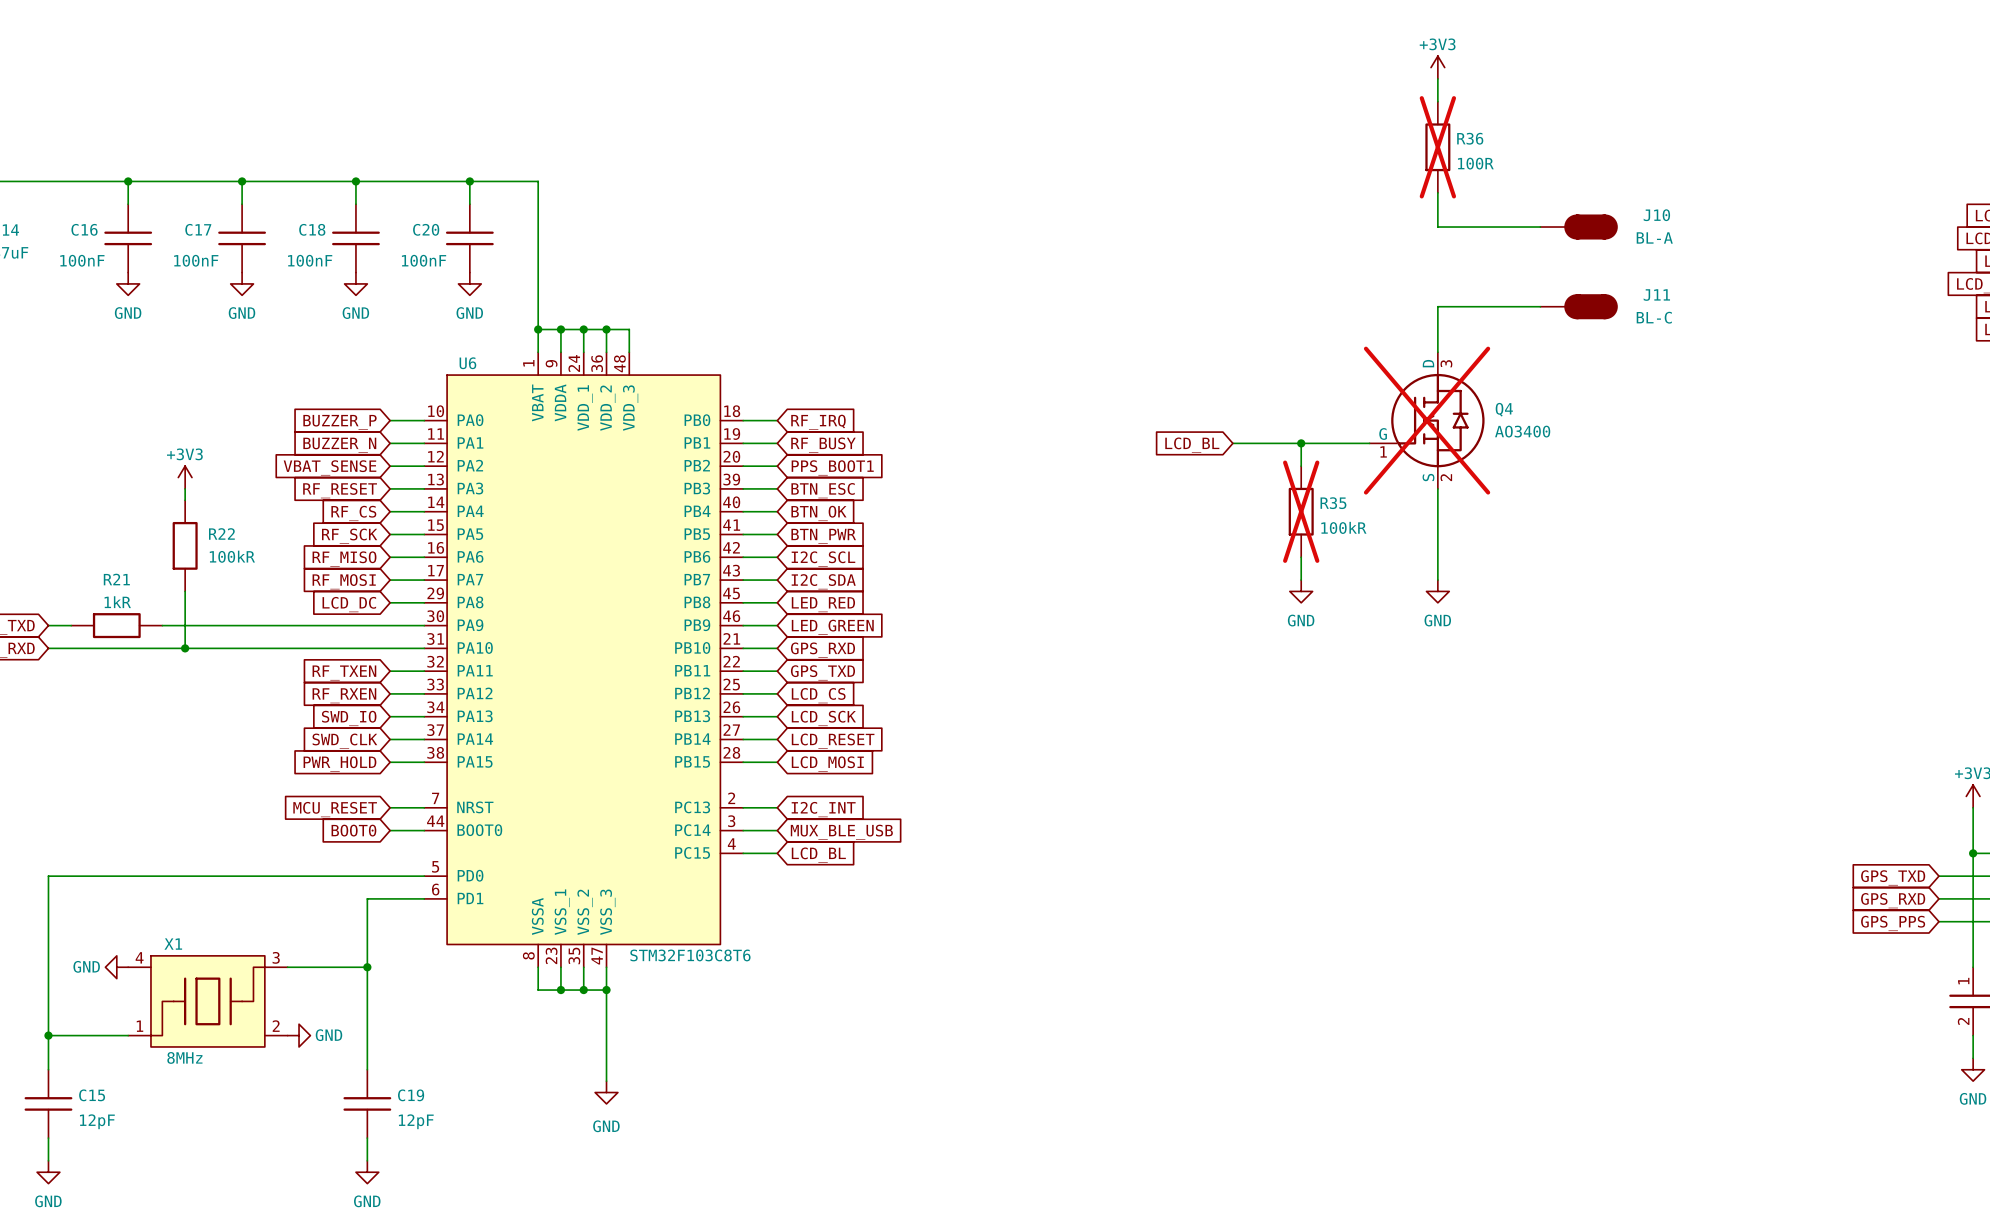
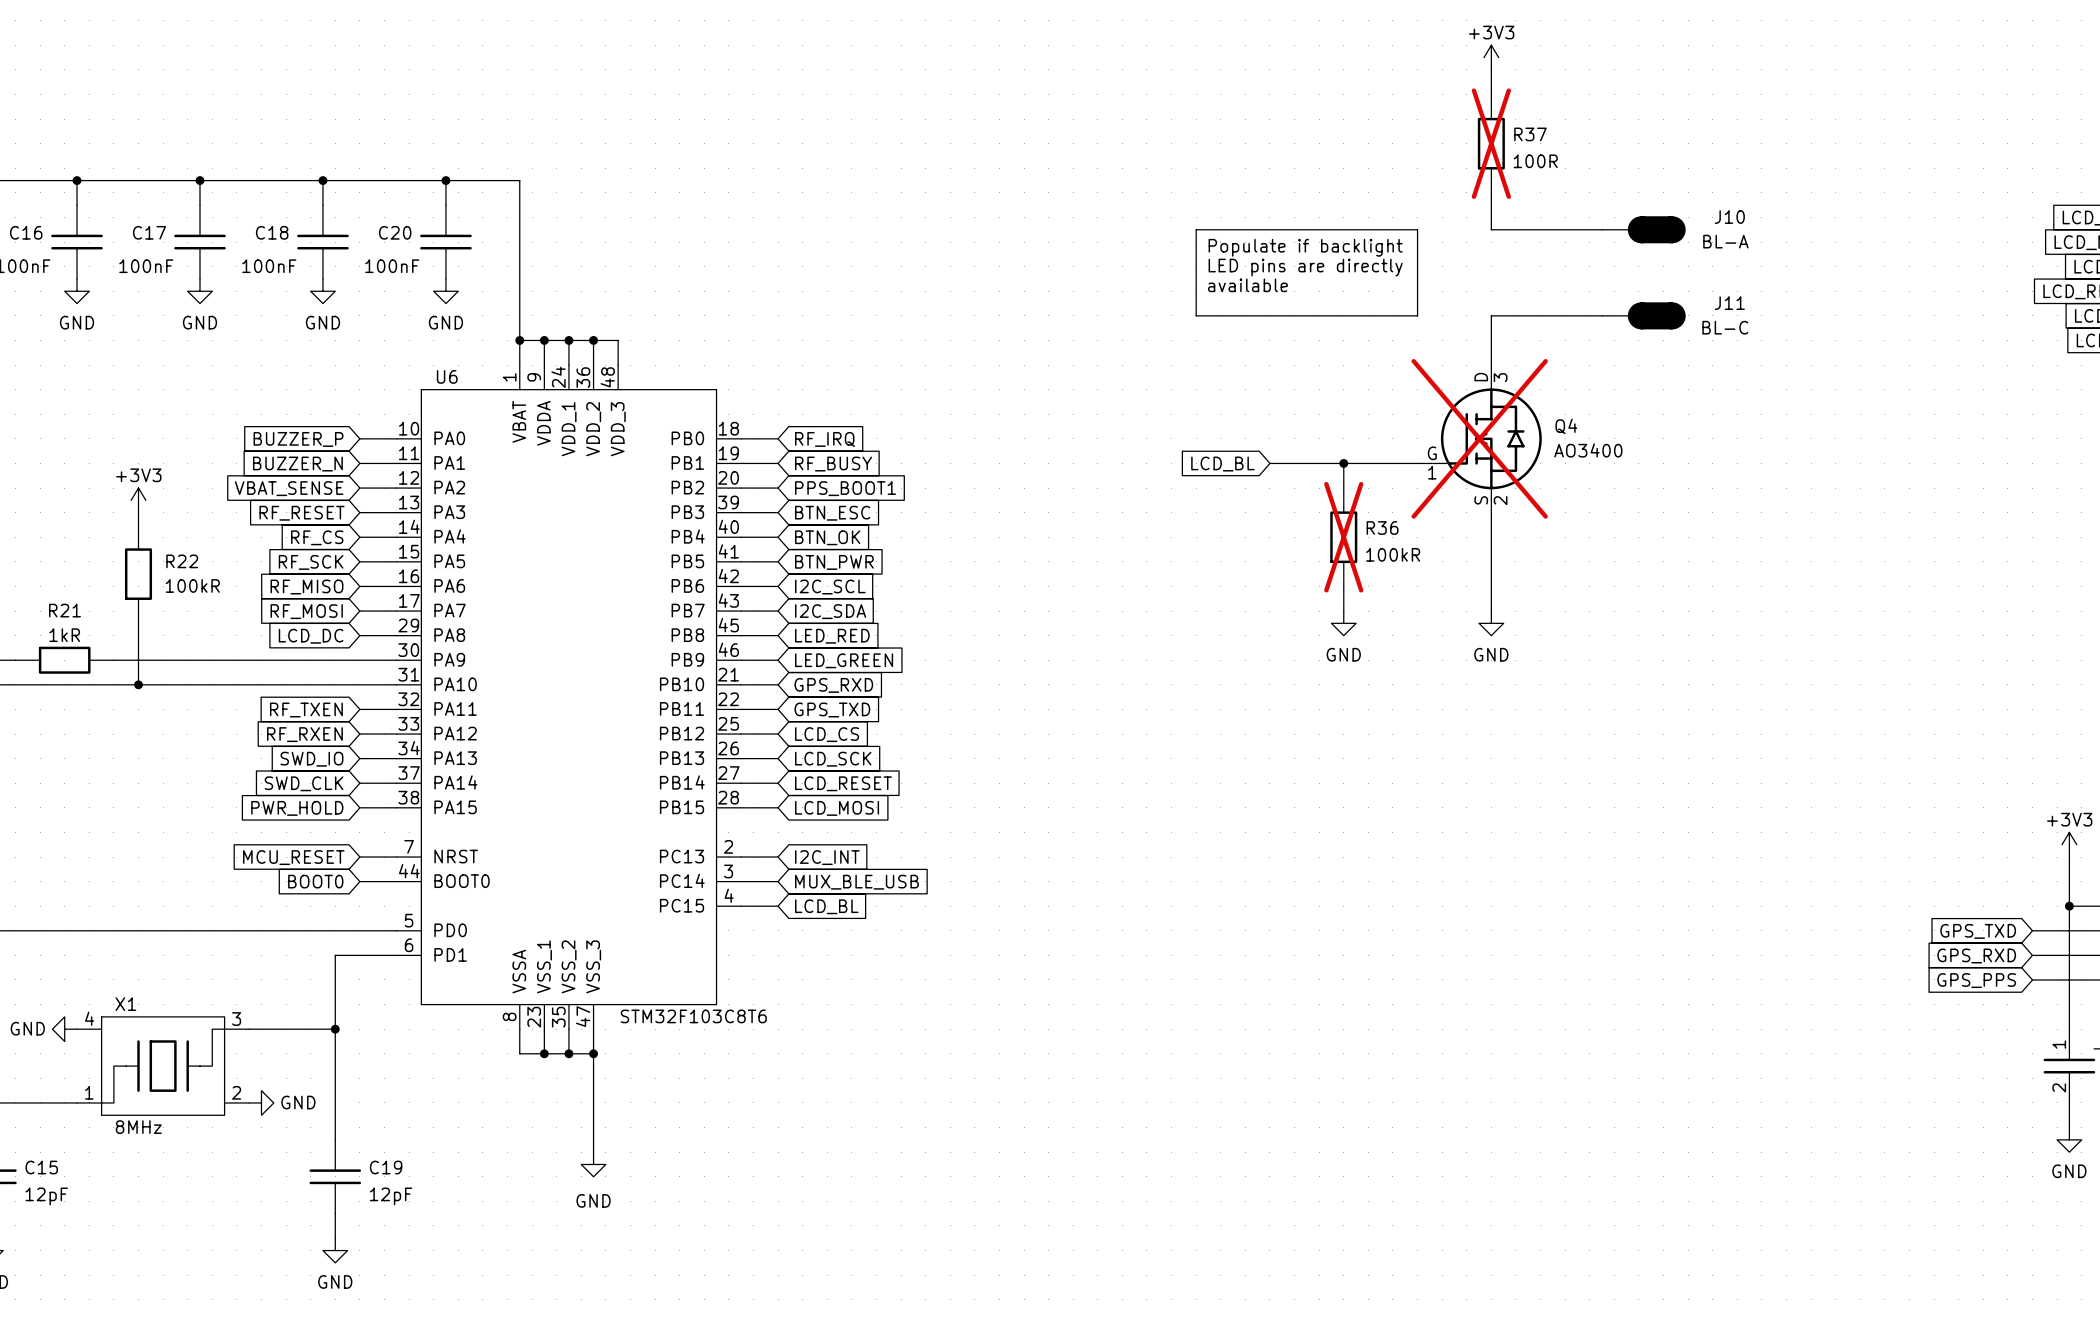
R36 name: R36 (1470, 138) -> R37 (1530, 134)
line: none -> (1196, 229) (1417, 229) (1417, 315) (1196, 315) (1196, 229)
text: none -> Populate if backlight (1305, 247)
text: none -> LED pins are directly (1305, 267)
text: none -> available (1247, 285)
R35 name: R35 (1333, 503) -> R36 (1382, 527)

